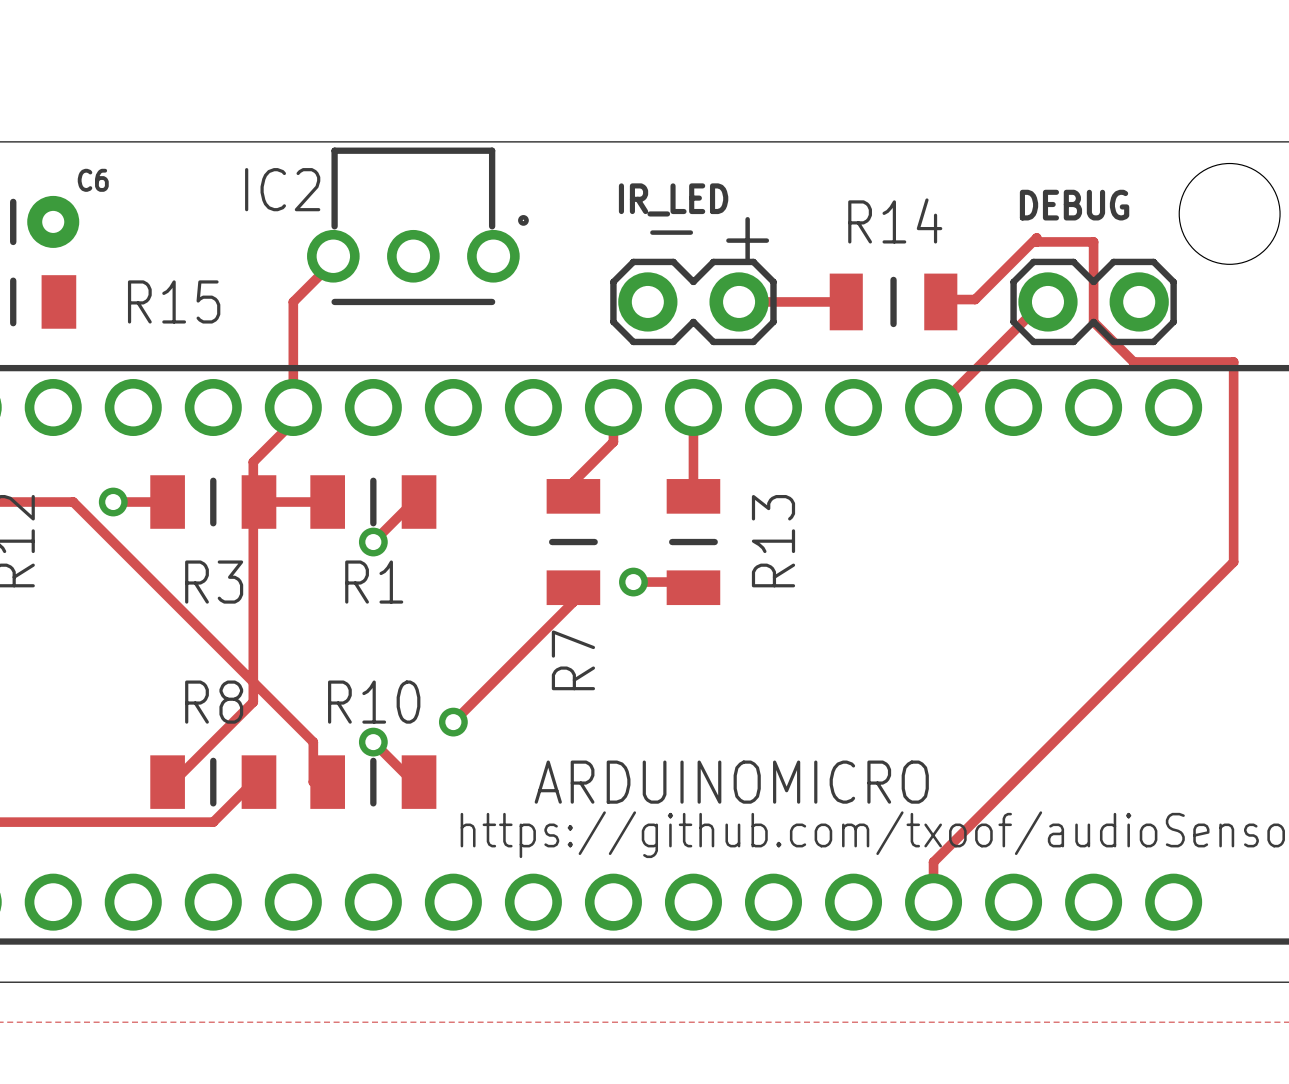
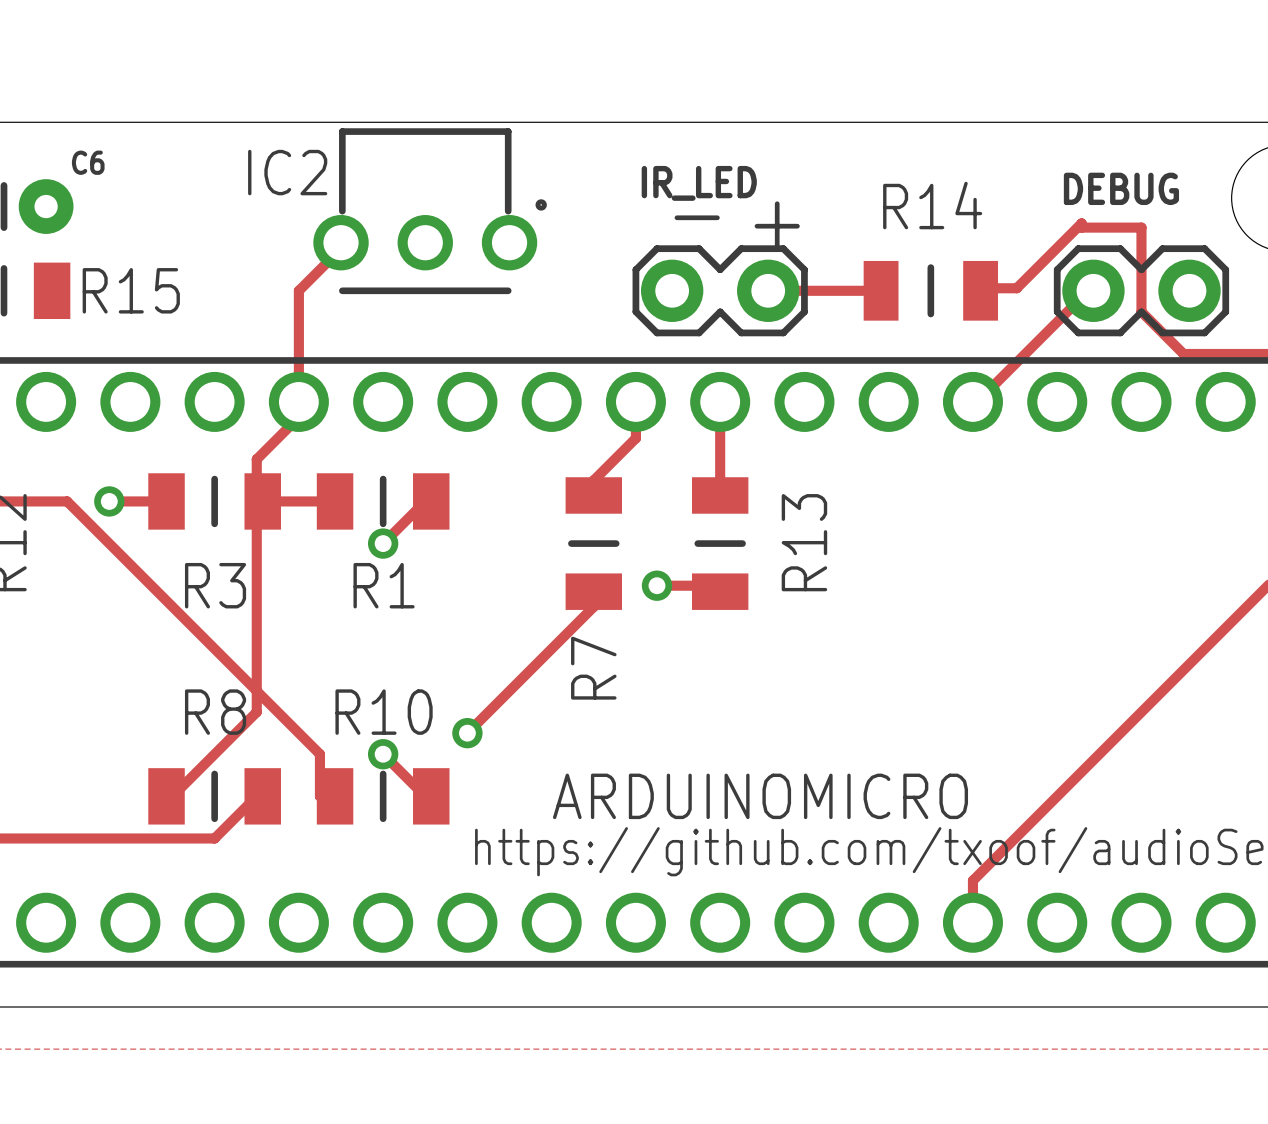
R15 name position: R15 (174, 301) -> R15 (131, 290)

